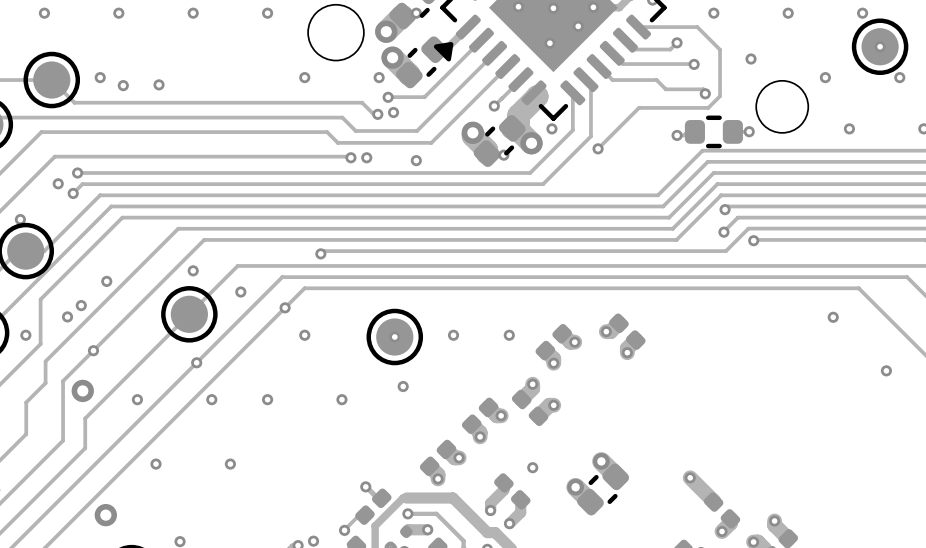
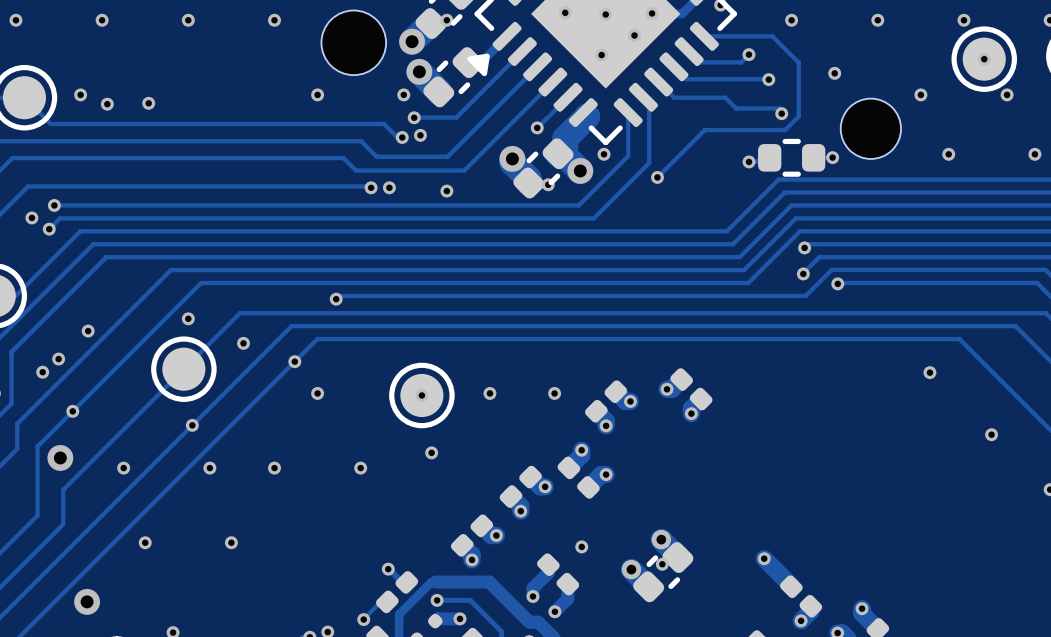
via: none -> (662, 564)

